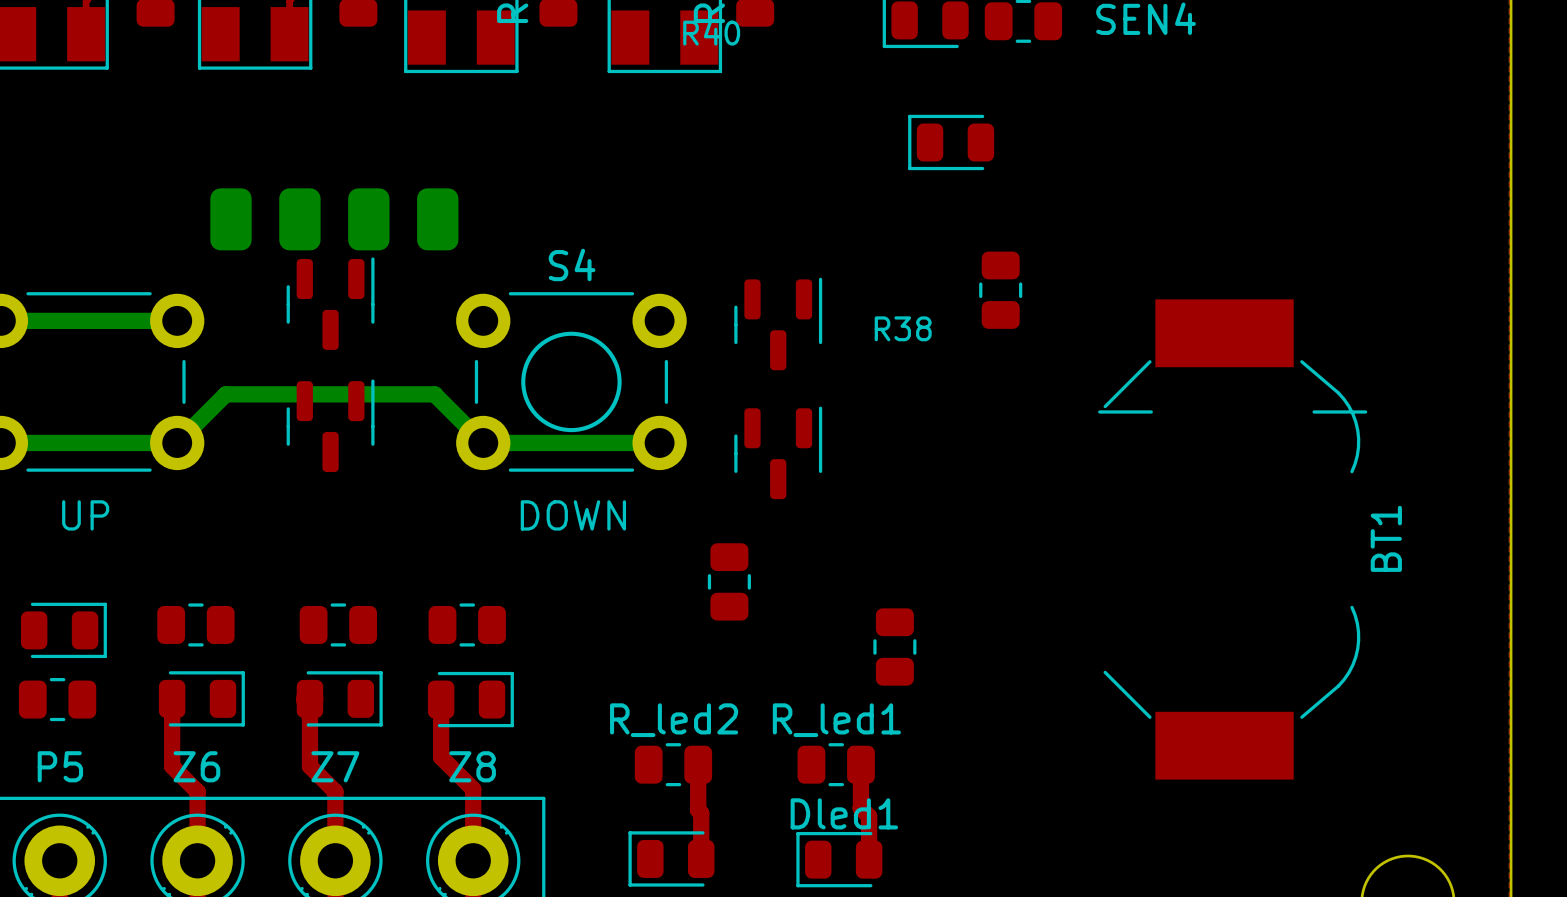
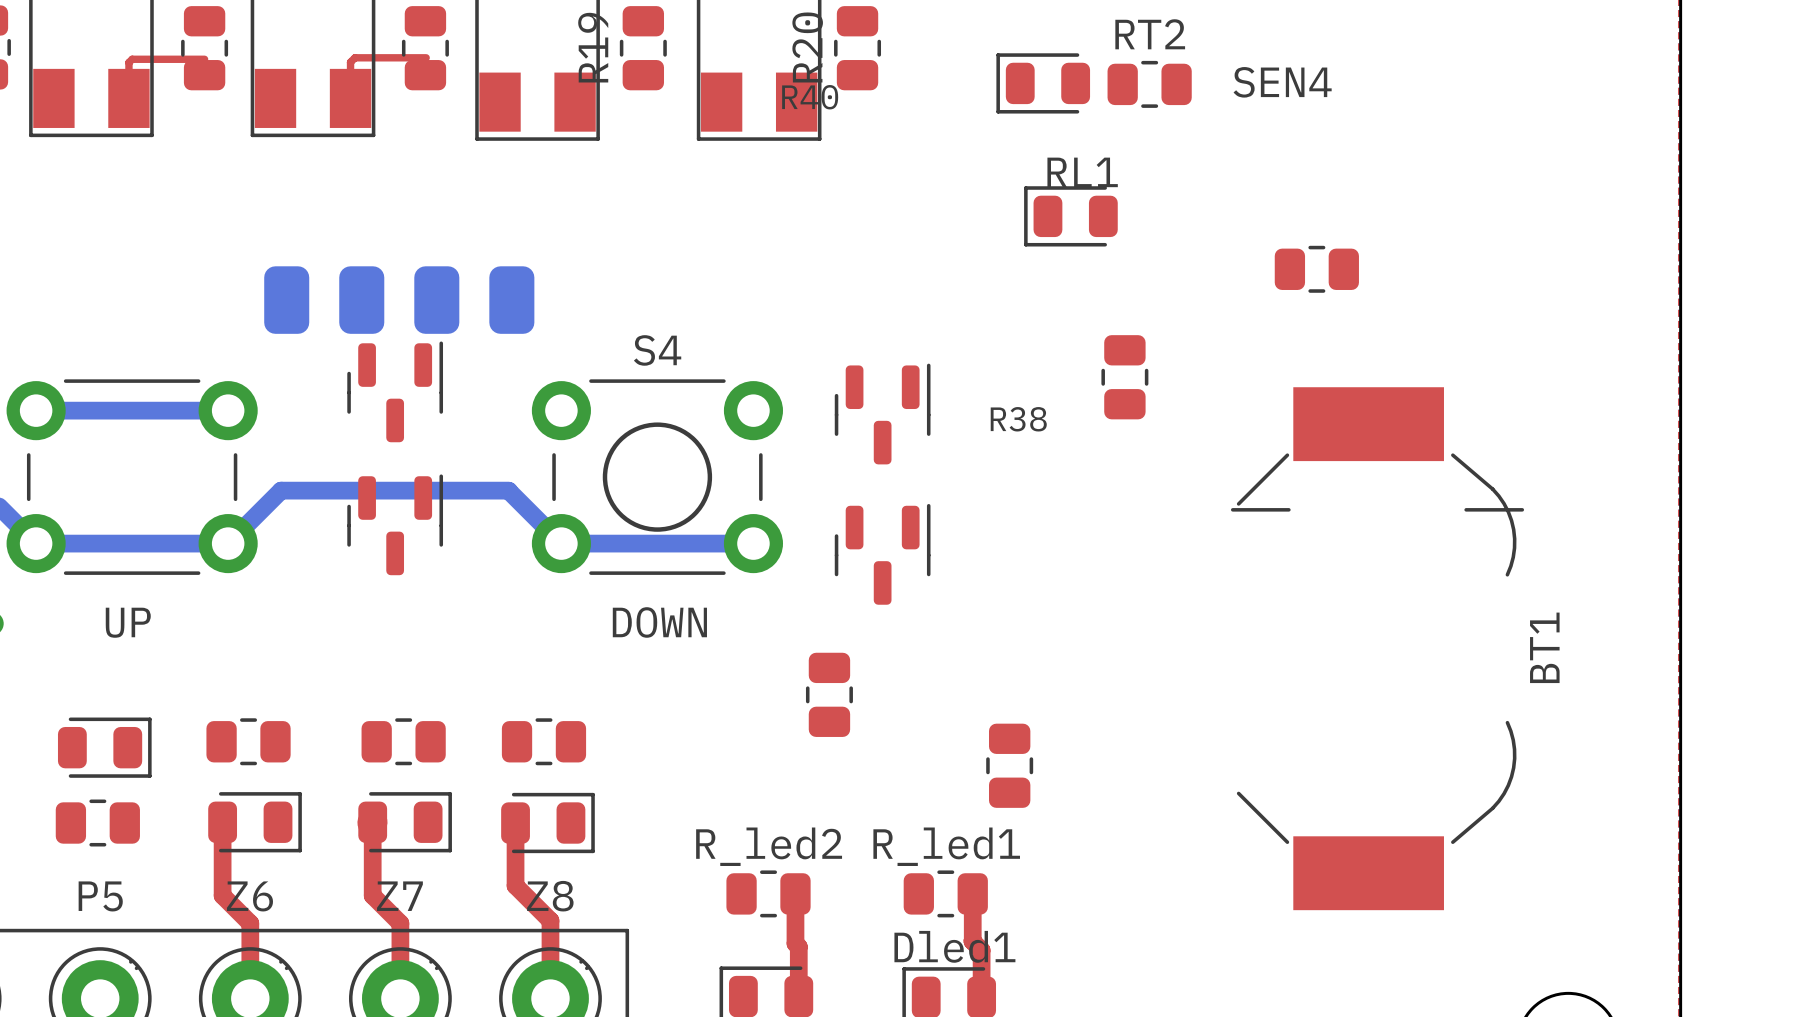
RL1: none -> (1316, 269)

